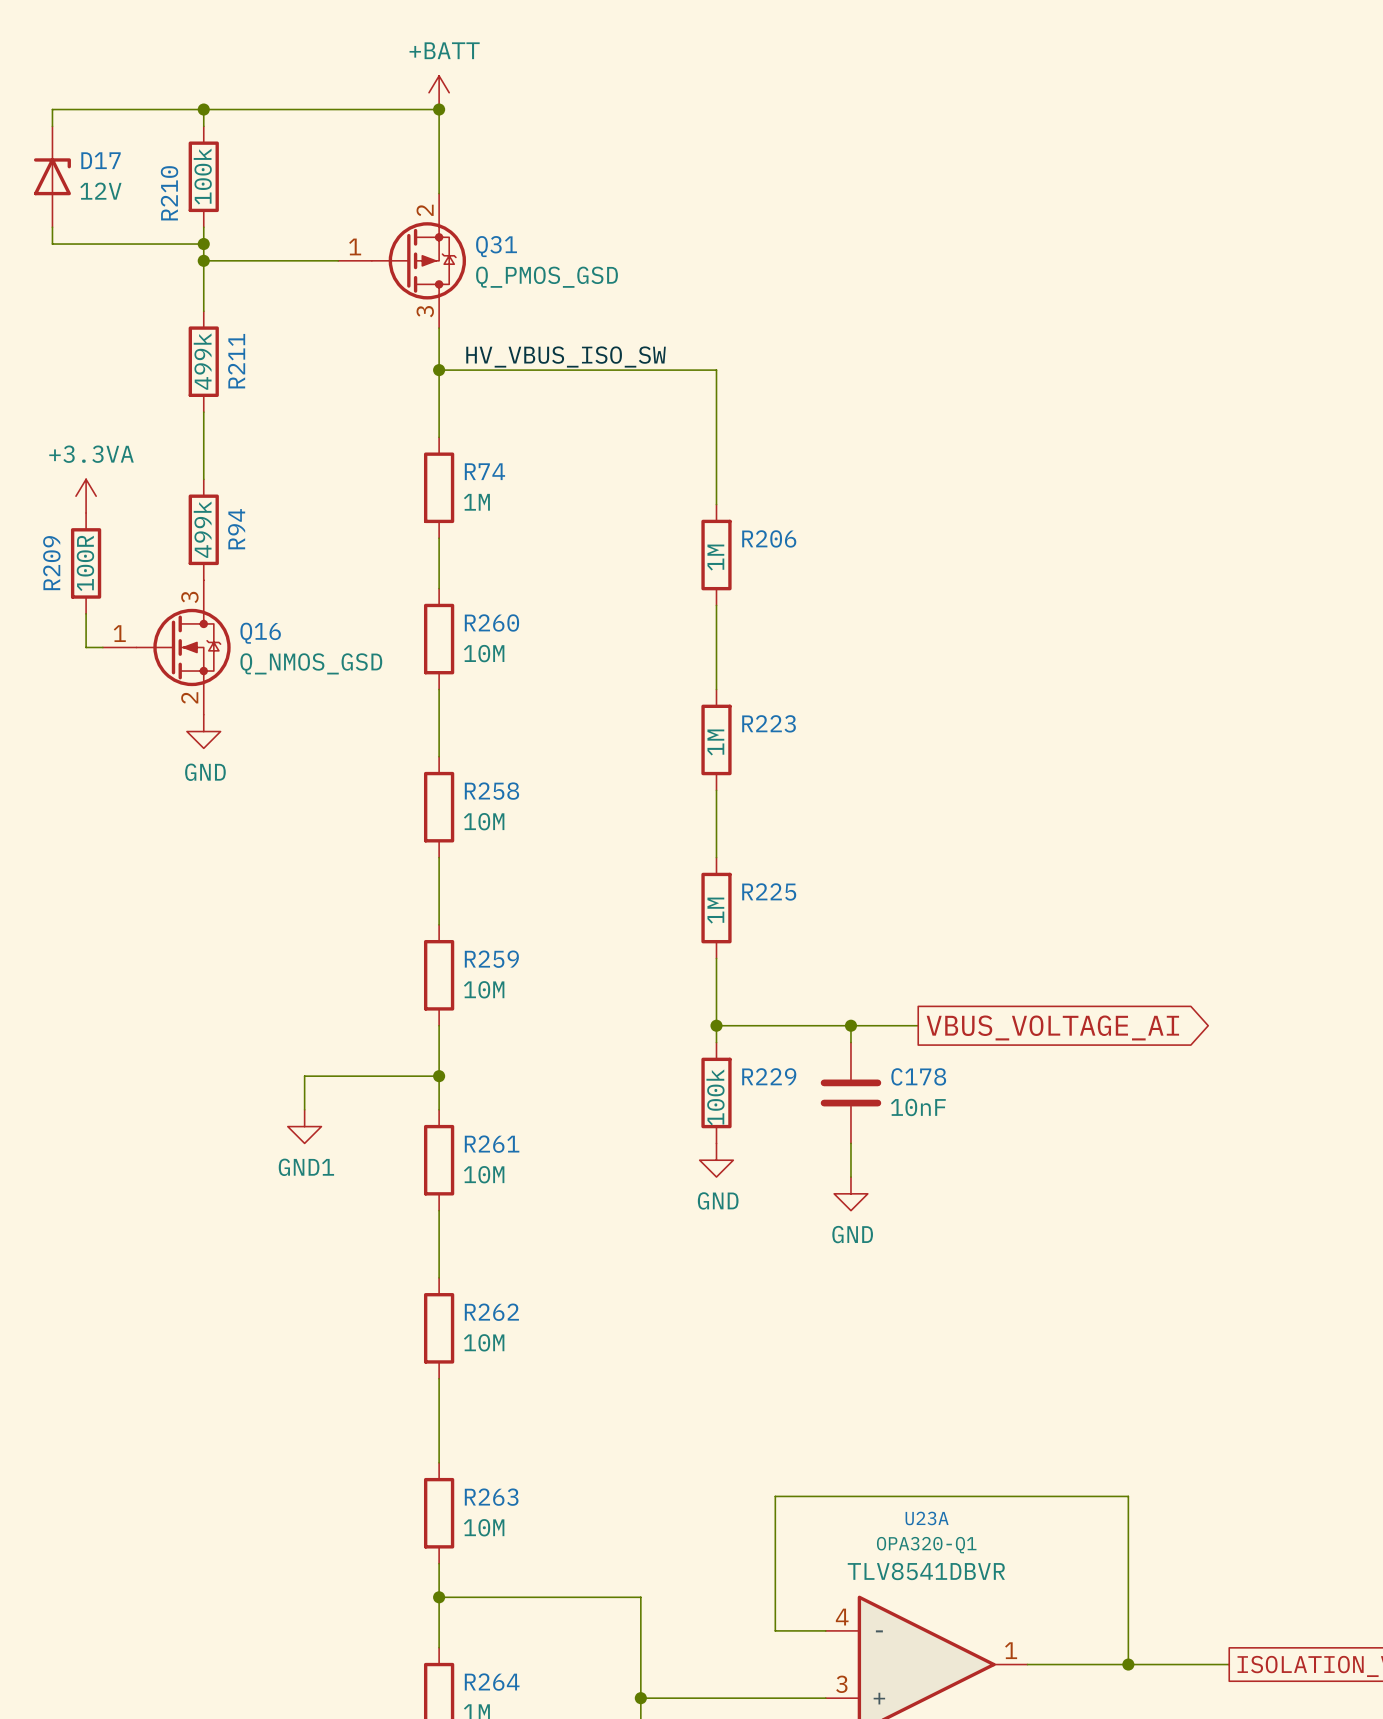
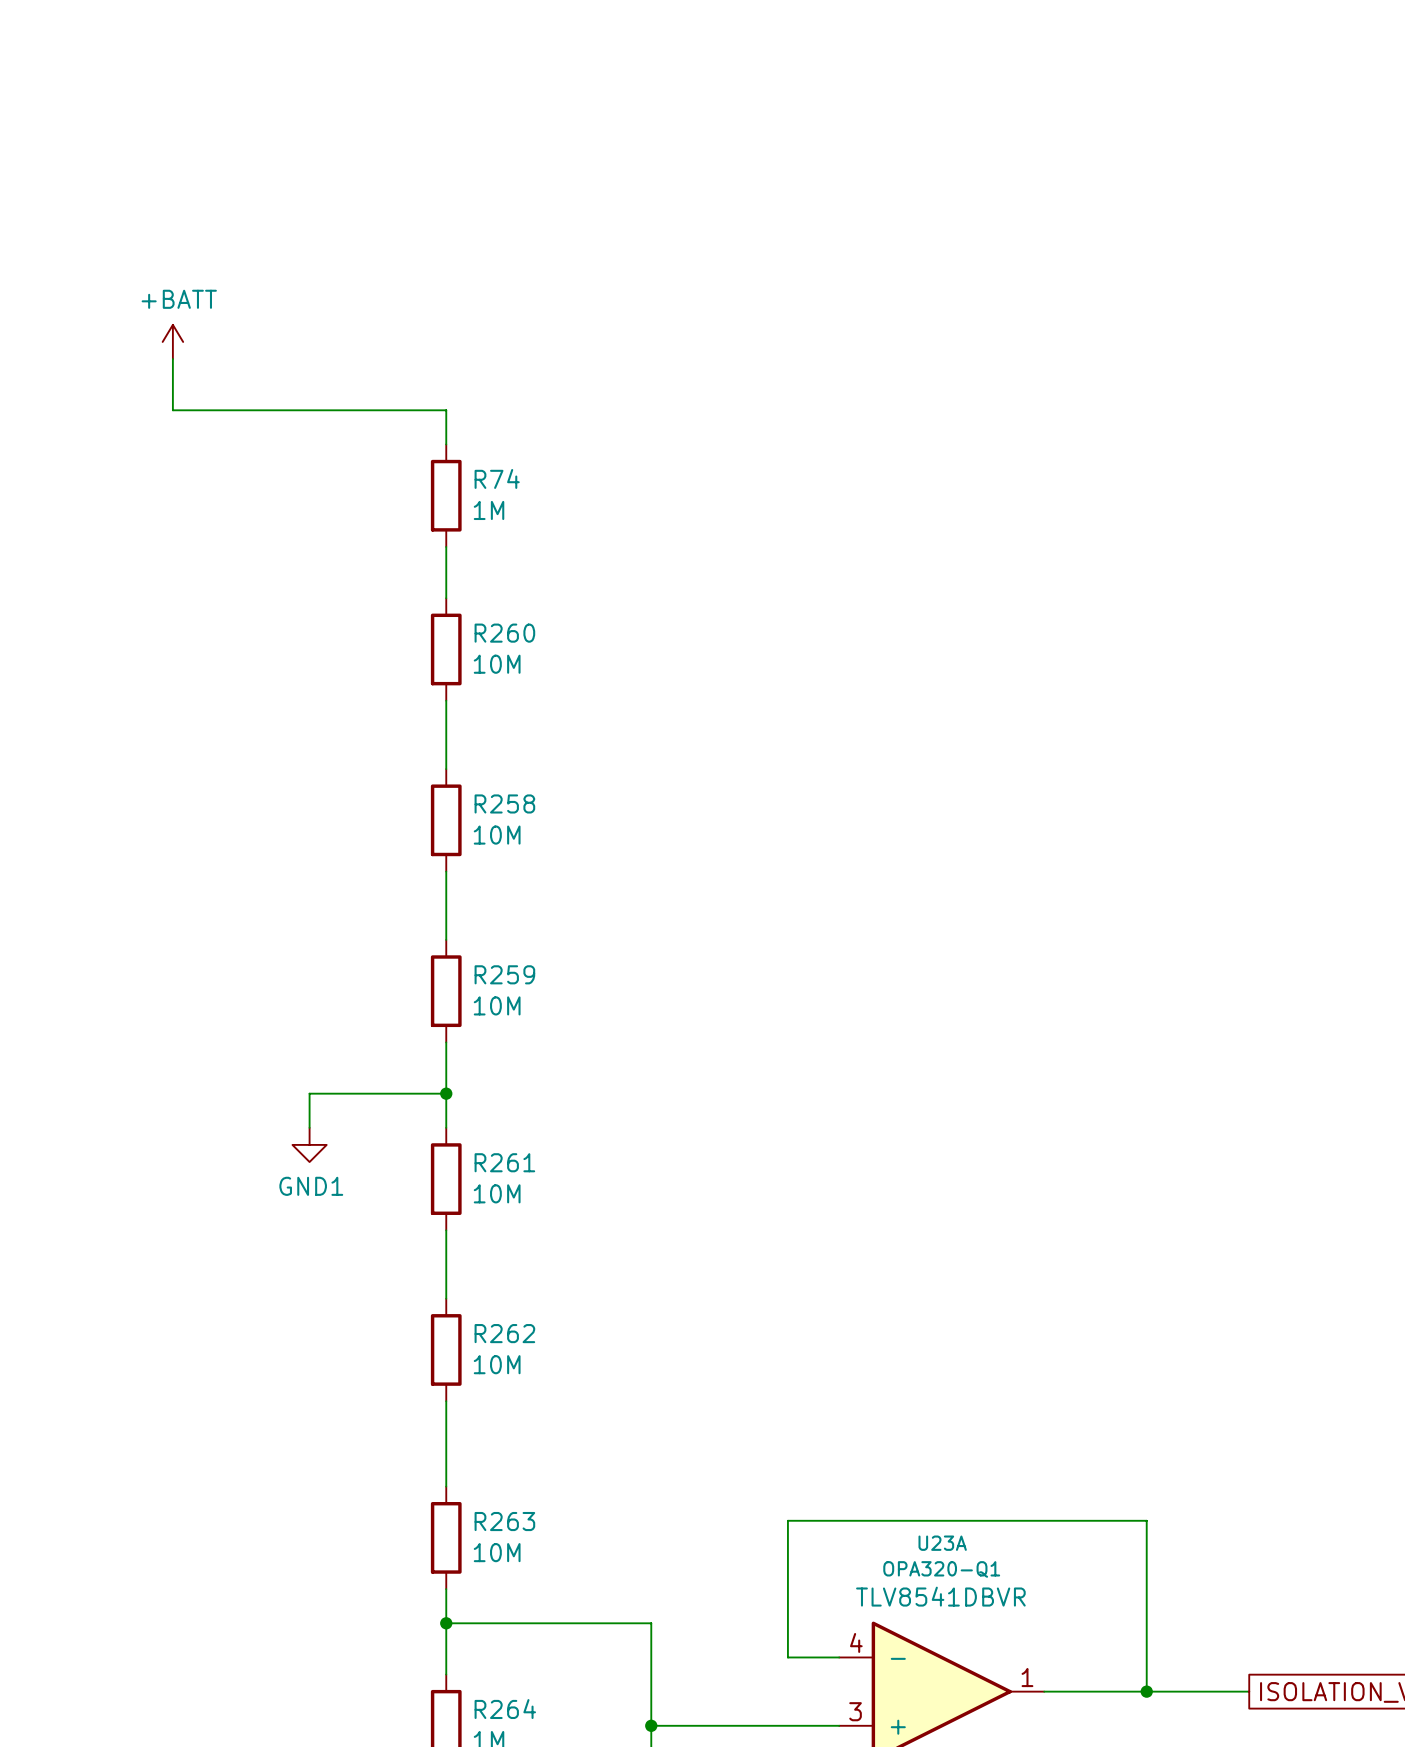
power symbol: +BATT (439, 92) -> none
wire: (203, 109) (203, 126) -> none
junction: (203, 109) -> none
junction: (439, 109) -> none
wire: (52, 126) (52, 109) (439, 109) (439, 193) -> none
D17: 12V (52, 176) -> none
R210: 100k (203, 176) -> none
wire: (52, 227) (52, 244) (203, 244) -> none
wire: (203, 227) (203, 311) -> none
junction: (203, 244) -> none
wire: (203, 260) (338, 260) -> none
junction: (203, 260) -> none
Q31: Q_PMOS_GSD (402, 260) -> none
wire: (439, 328) (439, 403) -> (172, 359) (172, 410) (446, 410)
power symbol: none -> +BATT (172, 341)
label: HV_VBUS_ISO_SW (566, 356) -> none
R211: 499k (203, 361) -> none
wire: (439, 370) (716, 370) (716, 504) -> none
junction: (439, 370) -> none
wire: (203, 412) (203, 479) -> none
power symbol: +3.3VA (86, 496) -> none
R94: 499k (203, 529) -> none
R206: 1M (716, 555) -> none
R209: 100R (86, 563) -> none
wire: (716, 605) (716, 689) -> none
wire: (86, 613) (86, 647) (102, 647) -> none
Q16: Q_NMOS_GSD (166, 647) -> none
power symbol: GND (203, 731) -> none
R223: 1M (716, 739) -> none
wire: (716, 790) (716, 857) -> none
R225: 1M (716, 908) -> none
wire: (716, 958) (716, 1042) -> none
wire: (716, 1025) (918, 1025) -> none
junction: (716, 1025) -> none
wire: (850, 1025) (850, 1042) -> none
junction: (850, 1025) -> none
global label: VBUS_VOLTAGE_AI (1052, 1027) -> none
R229: 100k (716, 1092) -> none
C178: 10nF (850, 1092) -> none
wire: (850, 1143) (850, 1177) -> none
power symbol: GND (716, 1160) -> none
power symbol: GND (850, 1193) -> none

